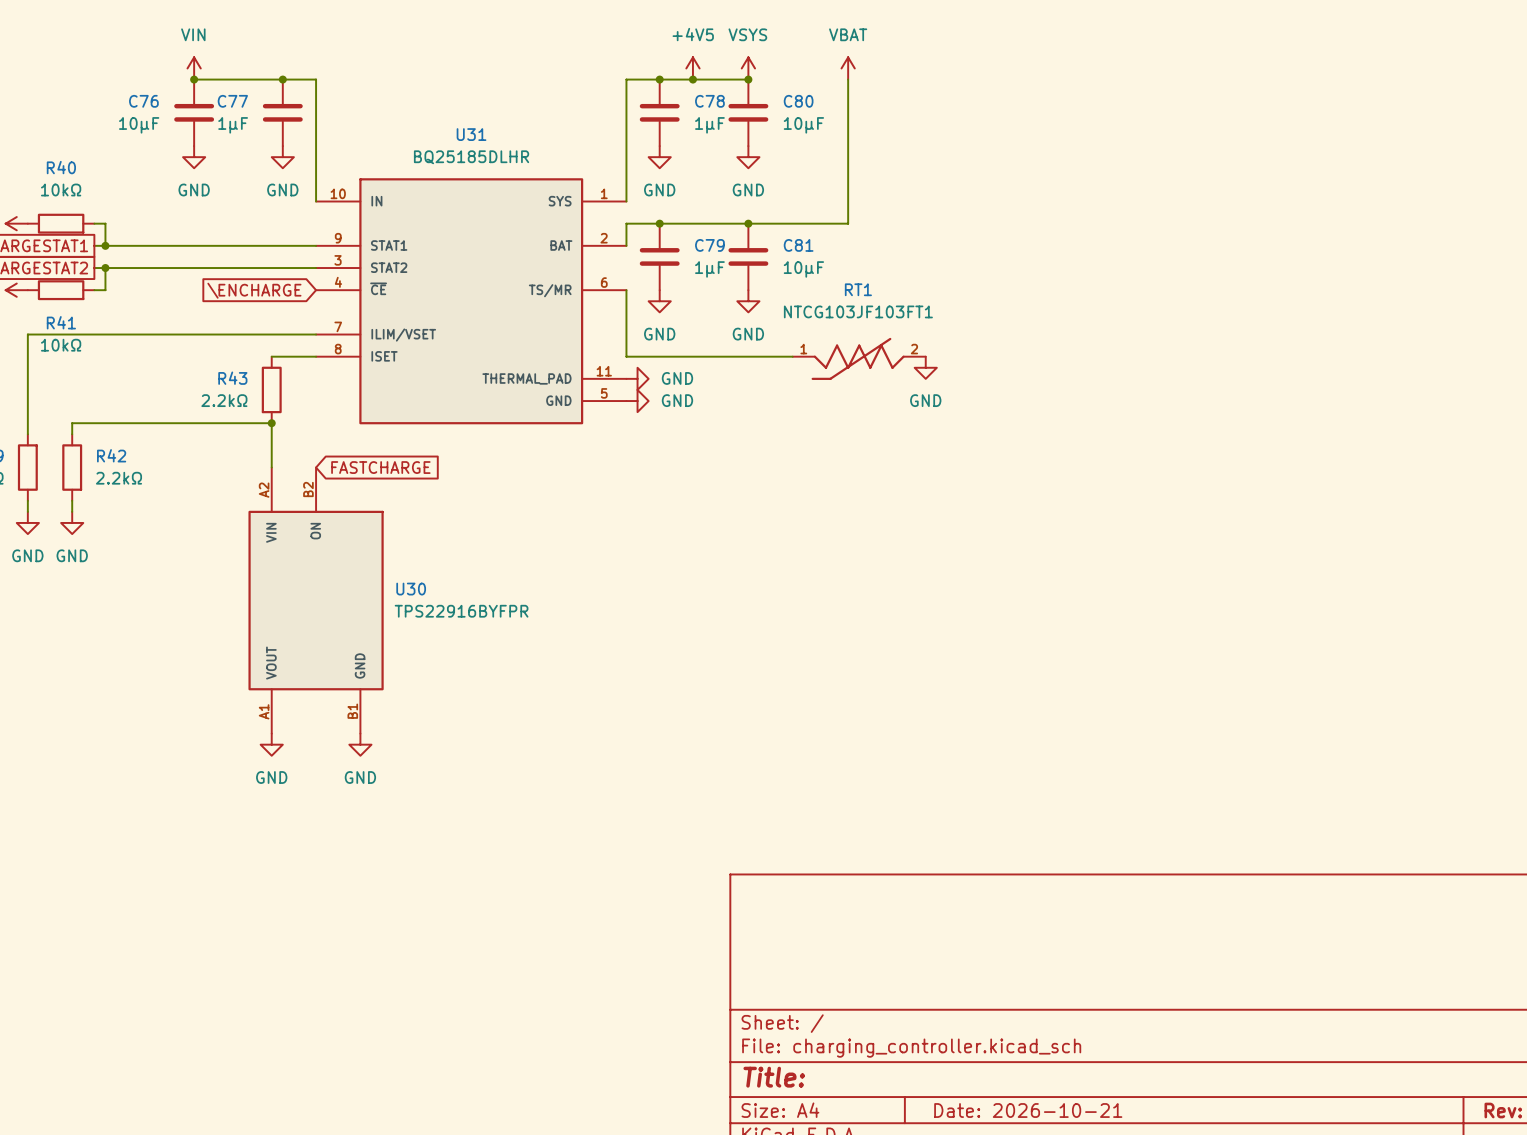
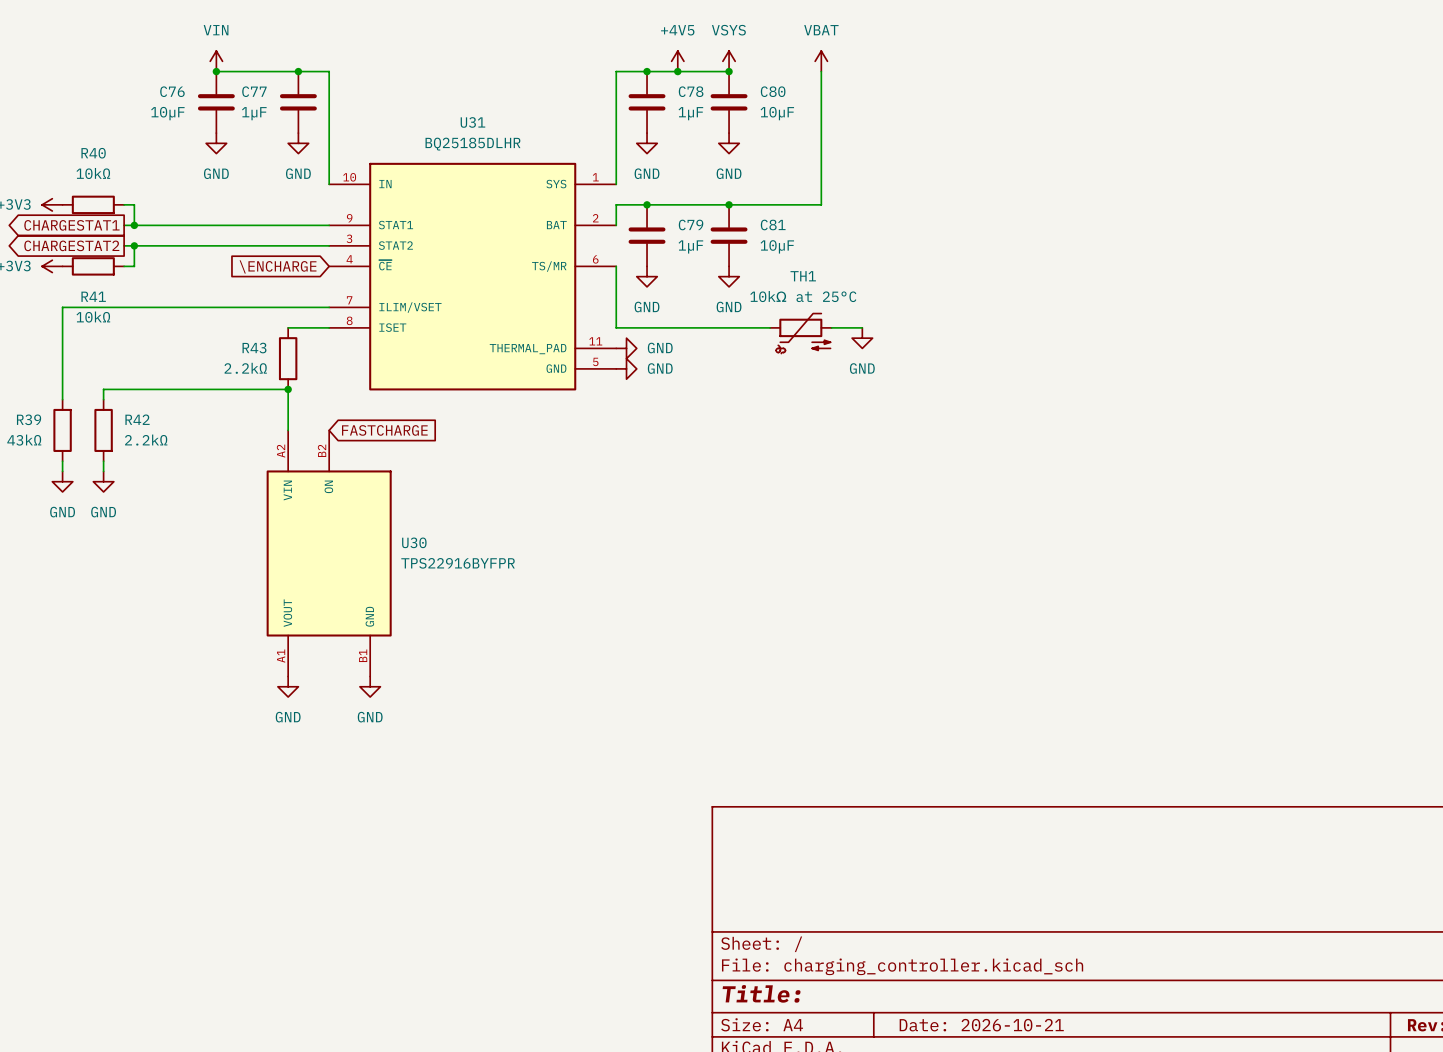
wire: none -> (831, 327) (862, 327)
RT1: NTCG103JF103FT1 (859, 358) -> none
TH1: none -> 10kΩ at 25°C (800, 333)
power symbol position: GND (925, 367) -> GND (862, 338)

